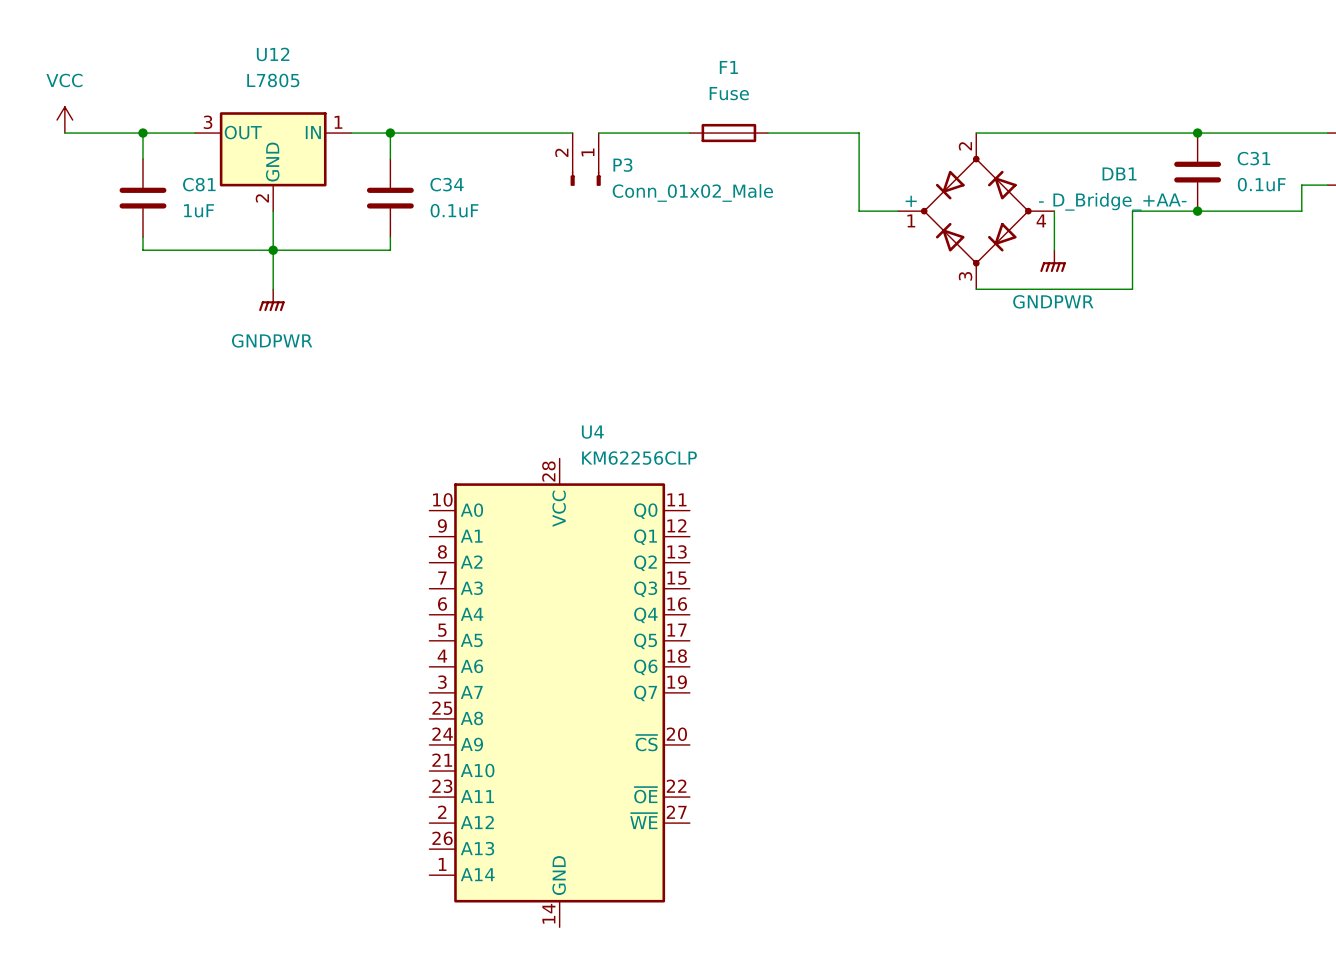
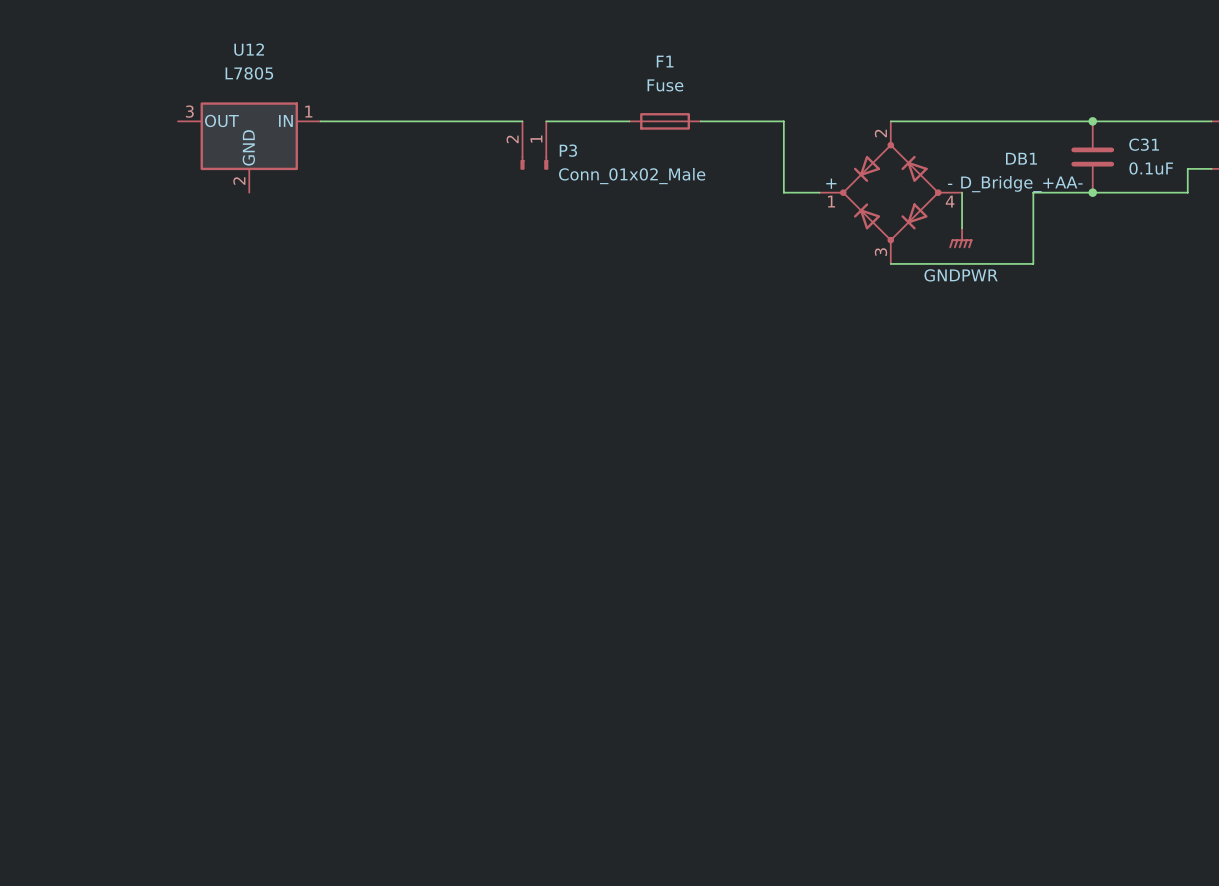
power symbol: VCC (64, 120) -> none
wire: (64, 133) (195, 133) -> none
wire: (142, 133) (142, 159) -> none
junction: (142, 133) -> none
wire: (390, 133) (390, 159) -> none
junction: (390, 133) -> none
C81: 1uF (142, 198) -> none
C34: 0.1uF (390, 198) -> none
wire: (273, 211) (273, 289) -> none
wire: (142, 237) (142, 250) (390, 250) (390, 237) -> none
junction: (273, 250) -> none
power symbol: GNDPWR (271, 300) -> none
U4: KM62256CLP (559, 692) -> none

